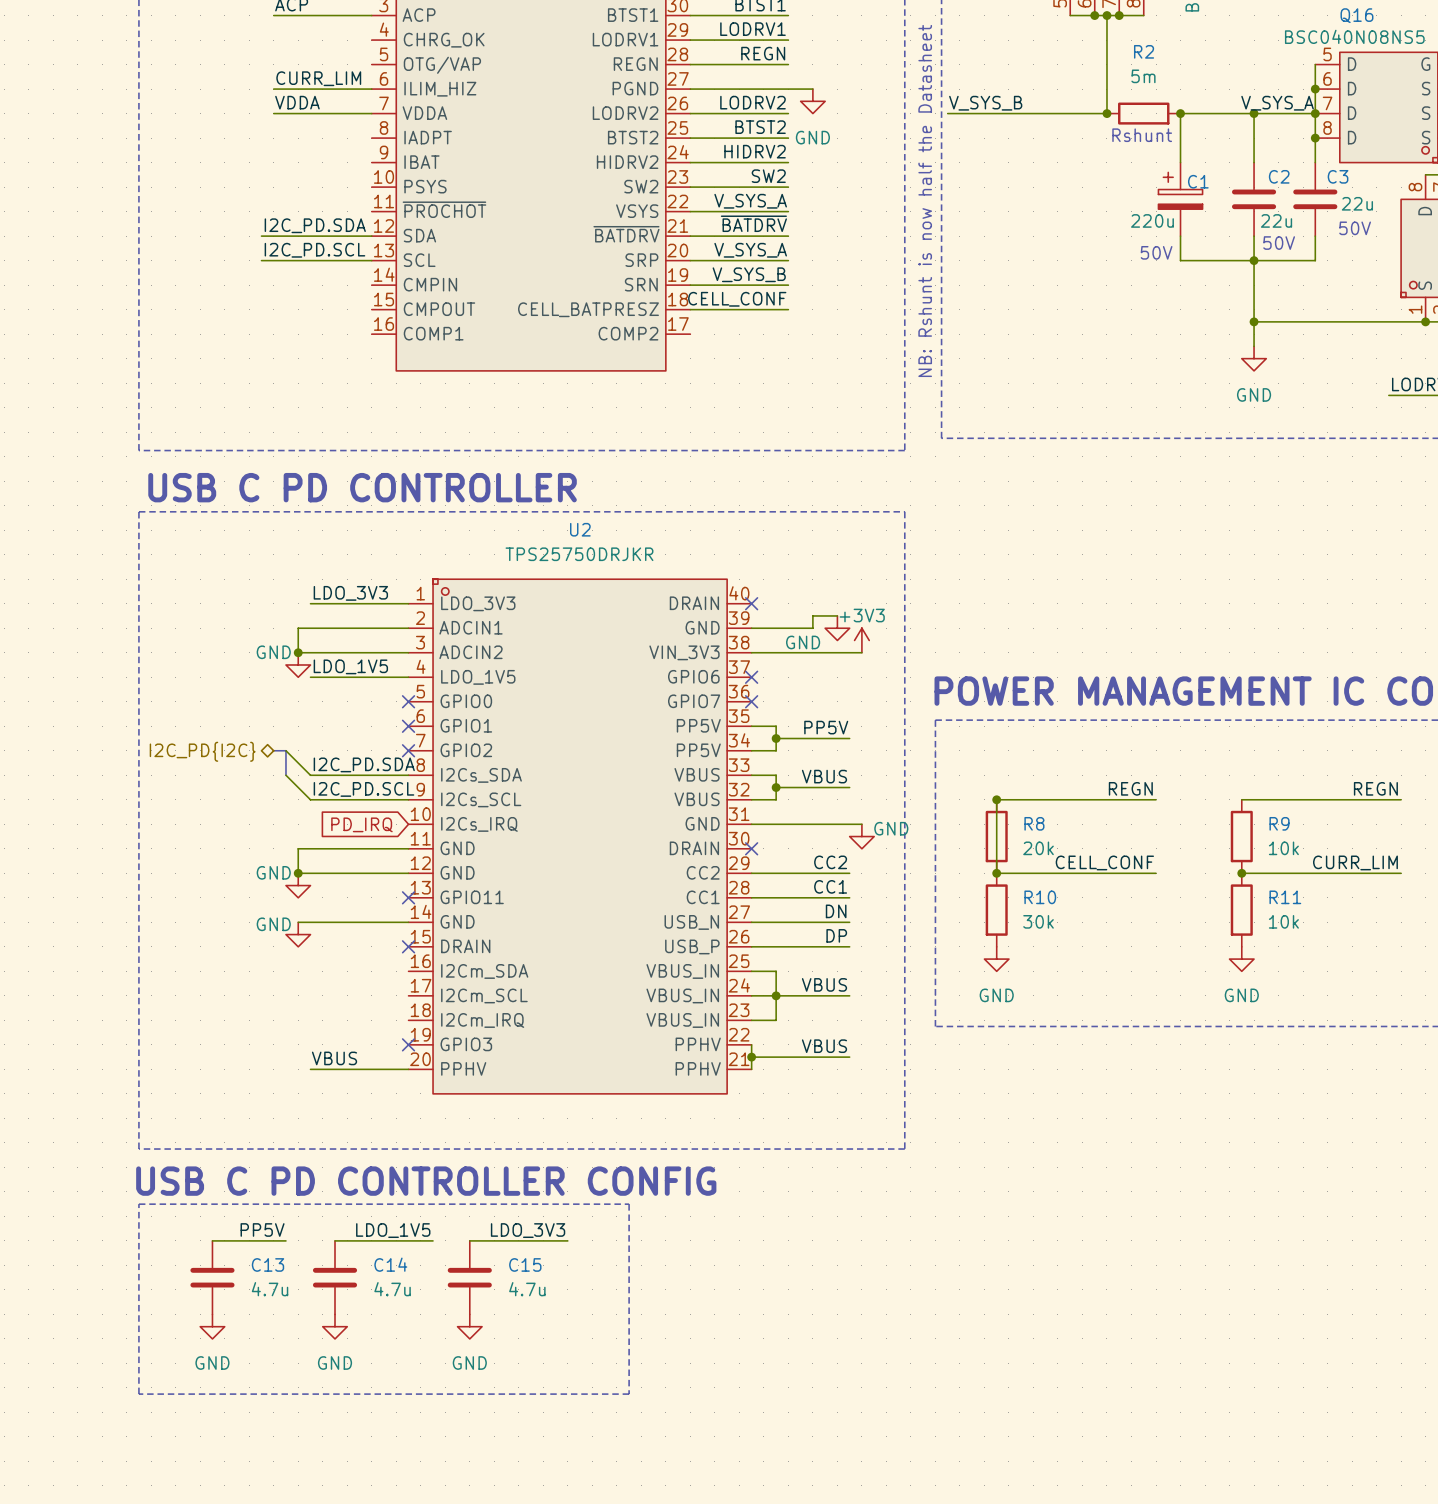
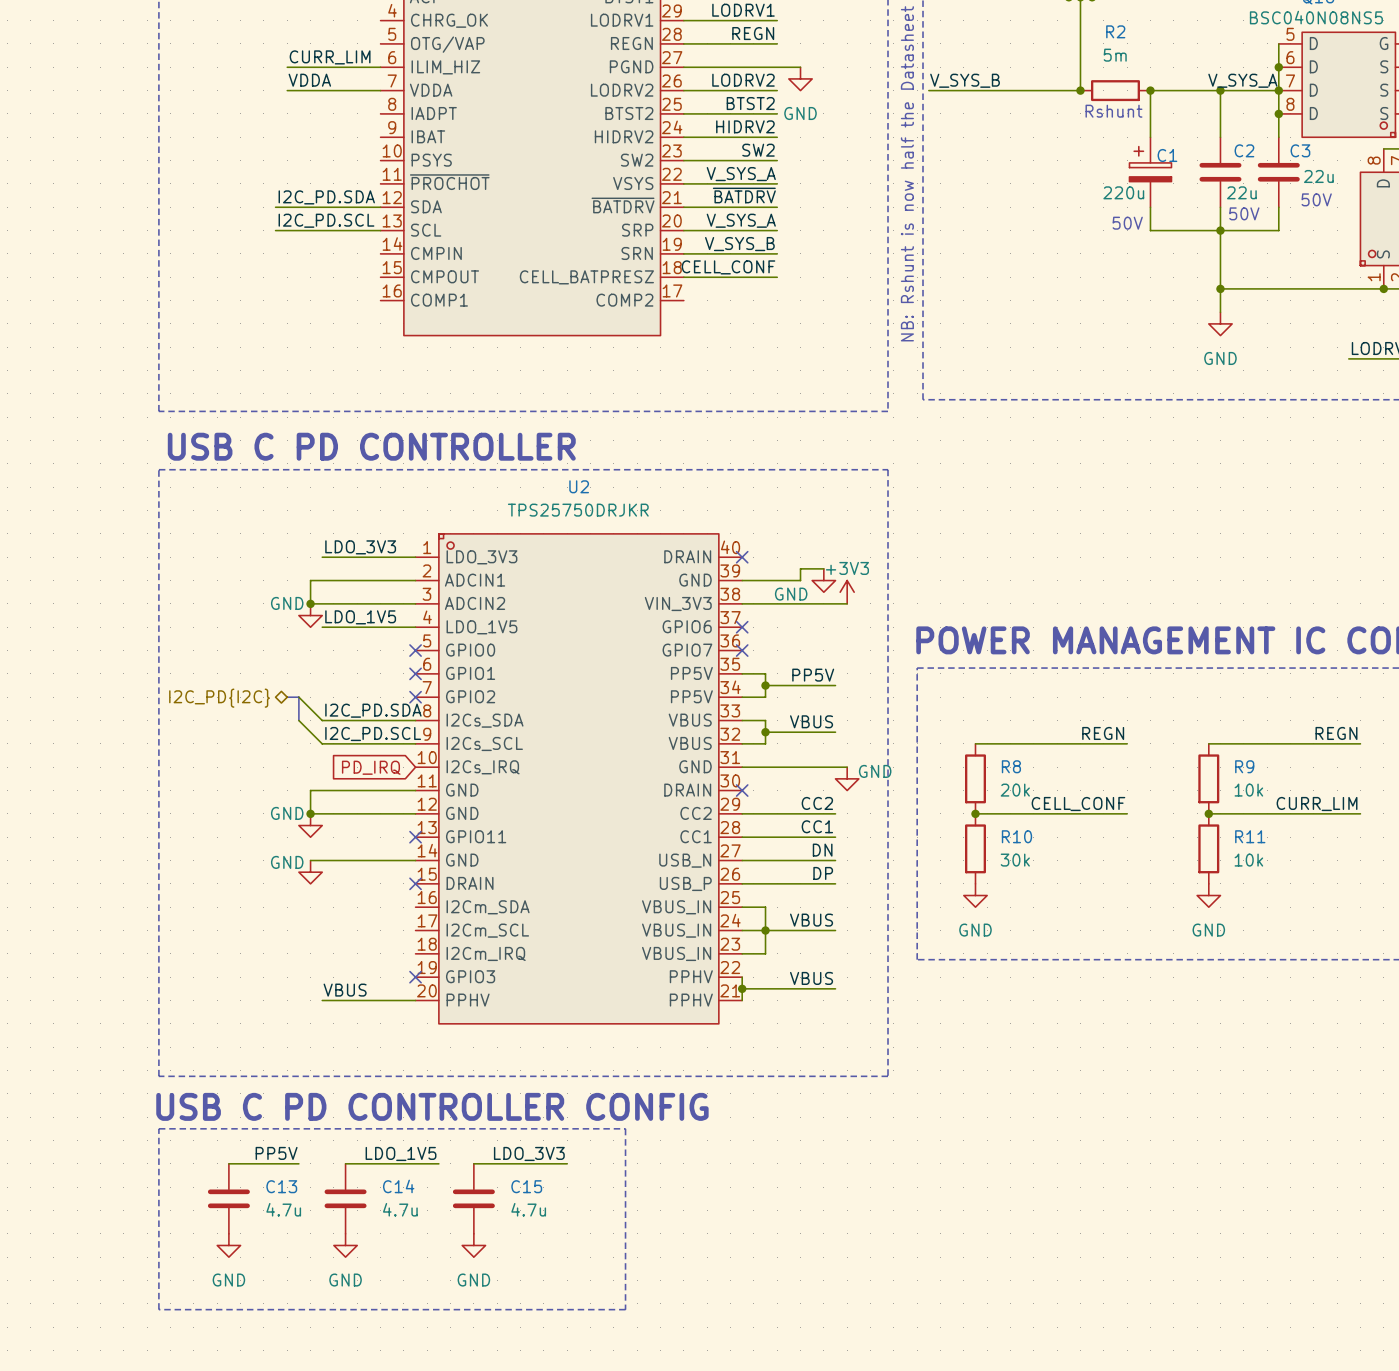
wire: (996, 799) (996, 873) -> none
junction: (996, 799) -> none

